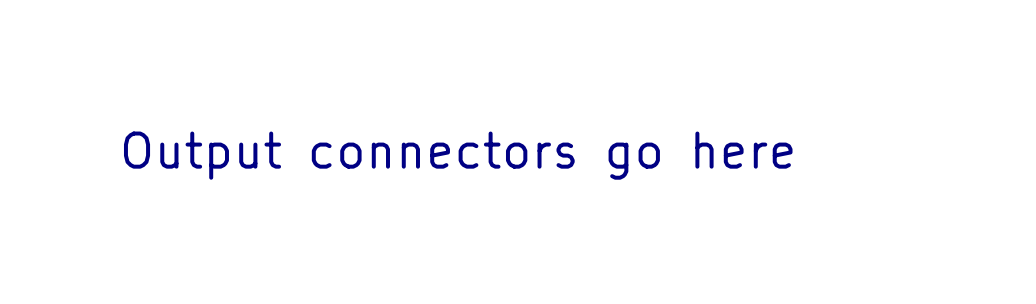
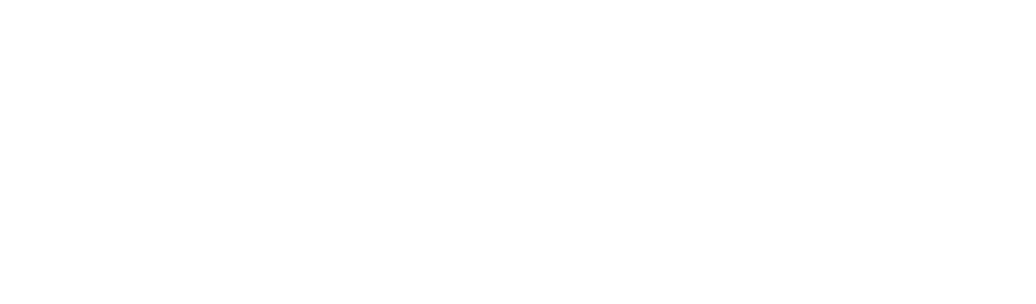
text: Output connectors go here (458, 155) -> none

